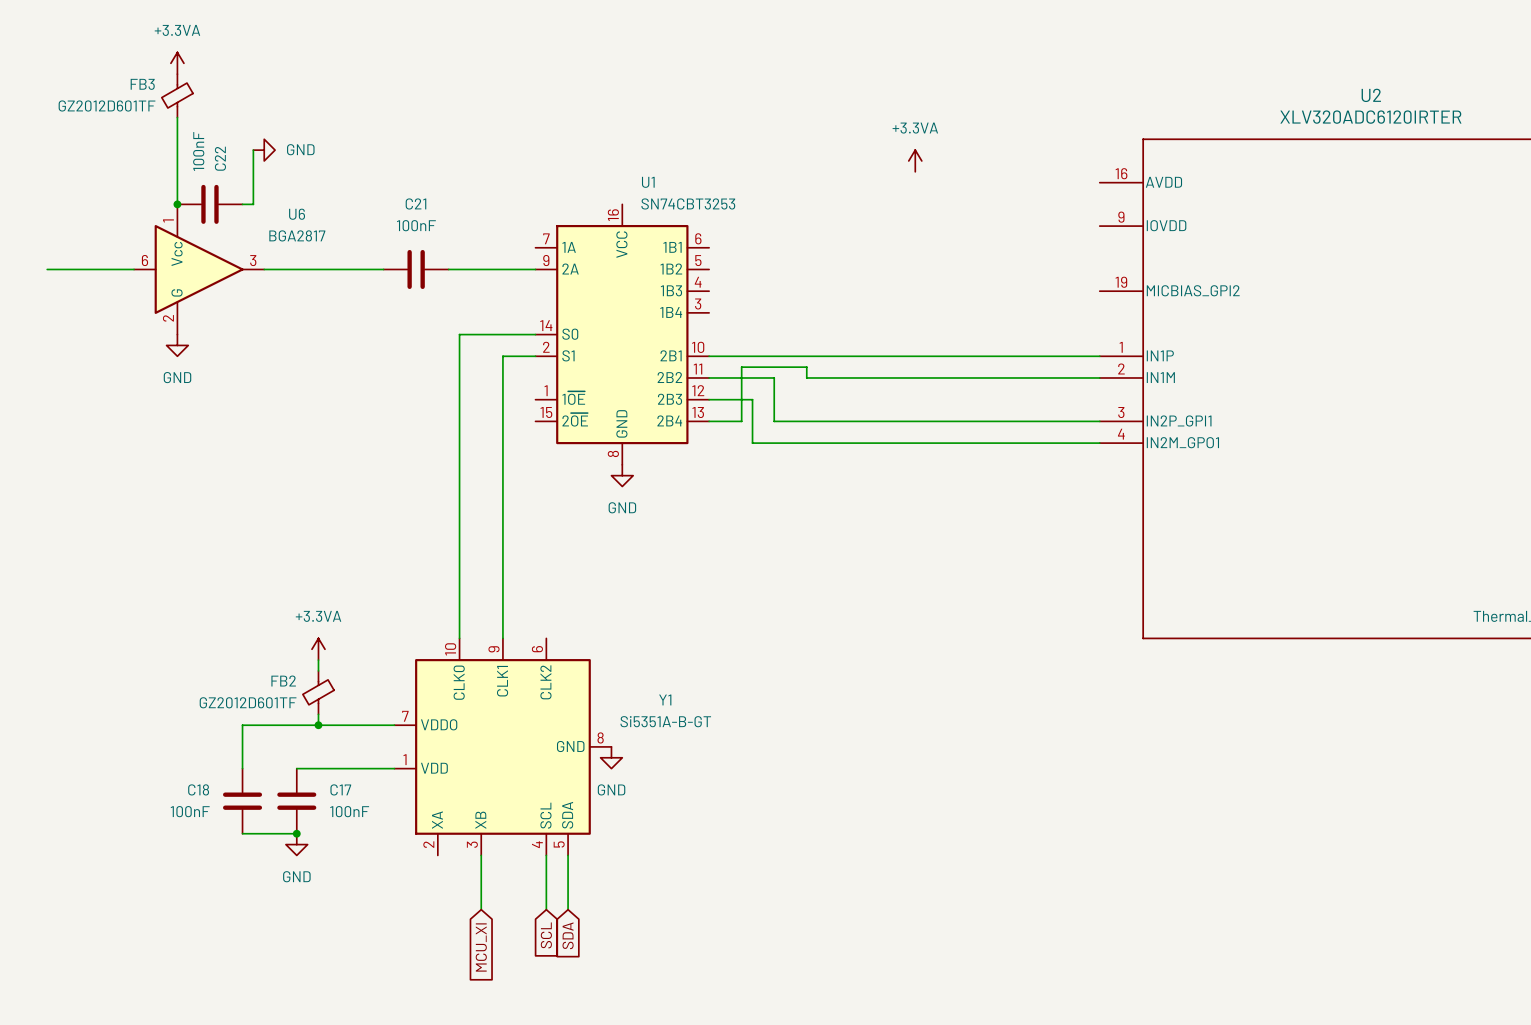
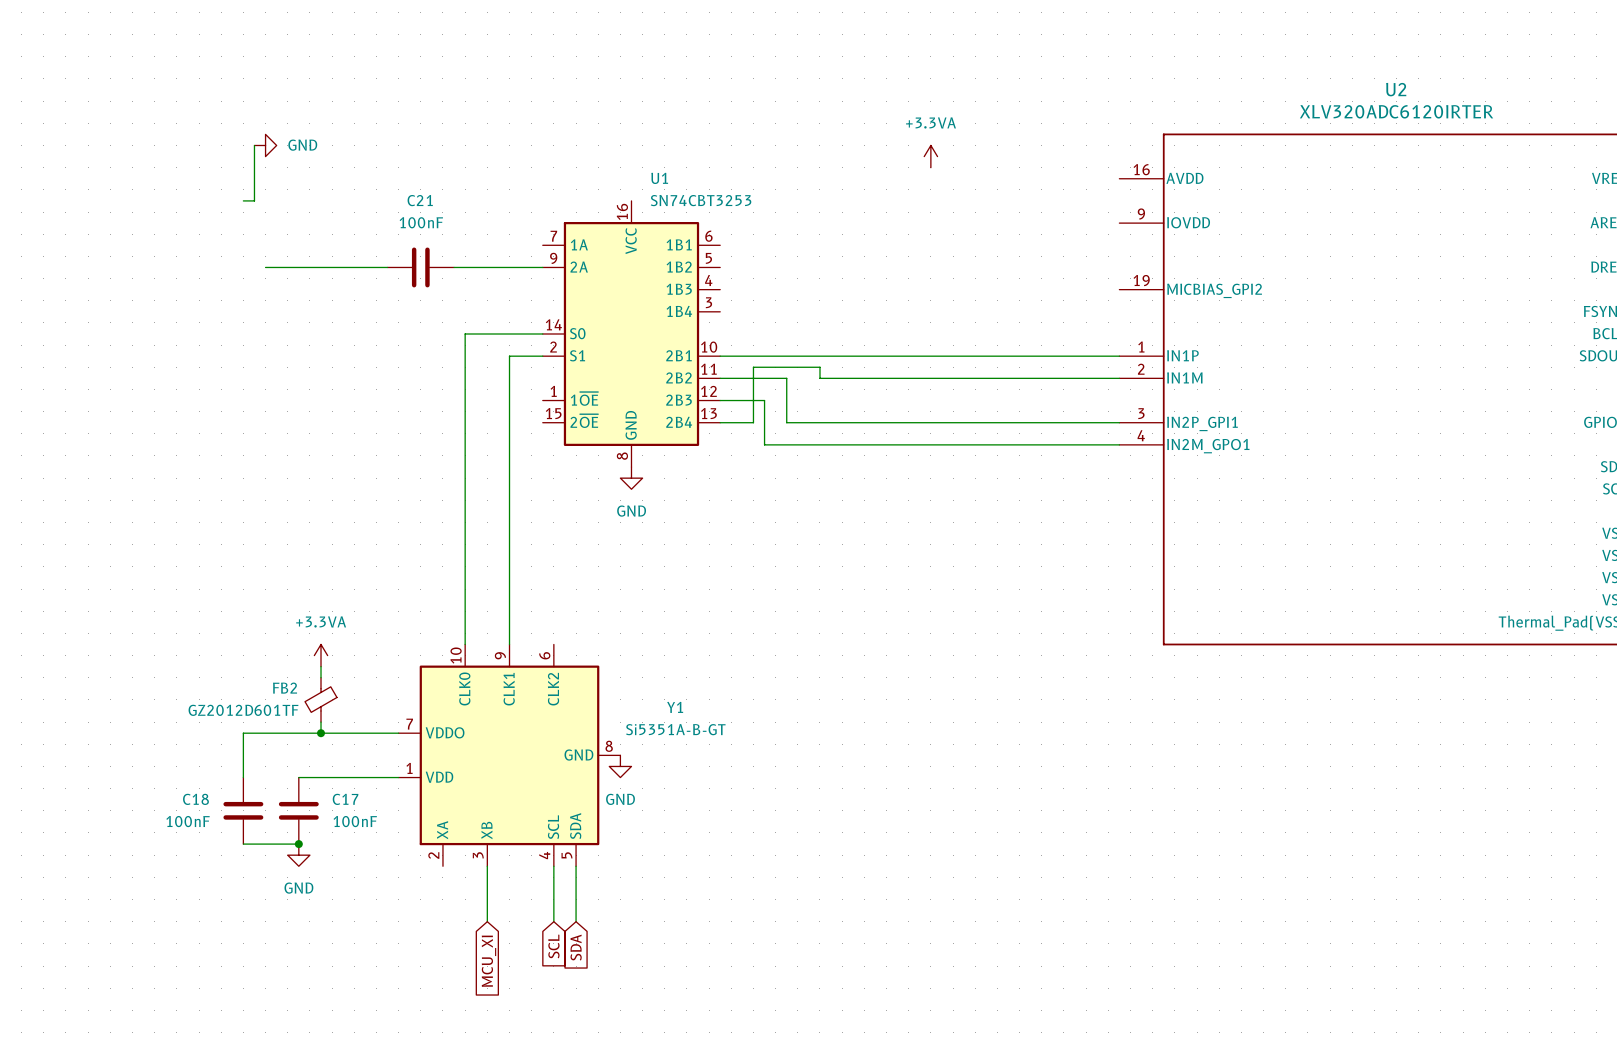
power symbol: +3.3VA (177, 63) -> none
FB3: GZ2012D601TF (177, 95) -> none
wire: (177, 117) (177, 204) -> none
junction: (177, 204) -> none
C22: 100nF (209, 204) -> none
wire: (47, 269) (134, 269) -> none
U6: BGA2817 (199, 269) -> none
power symbol: GND (177, 345) -> none

